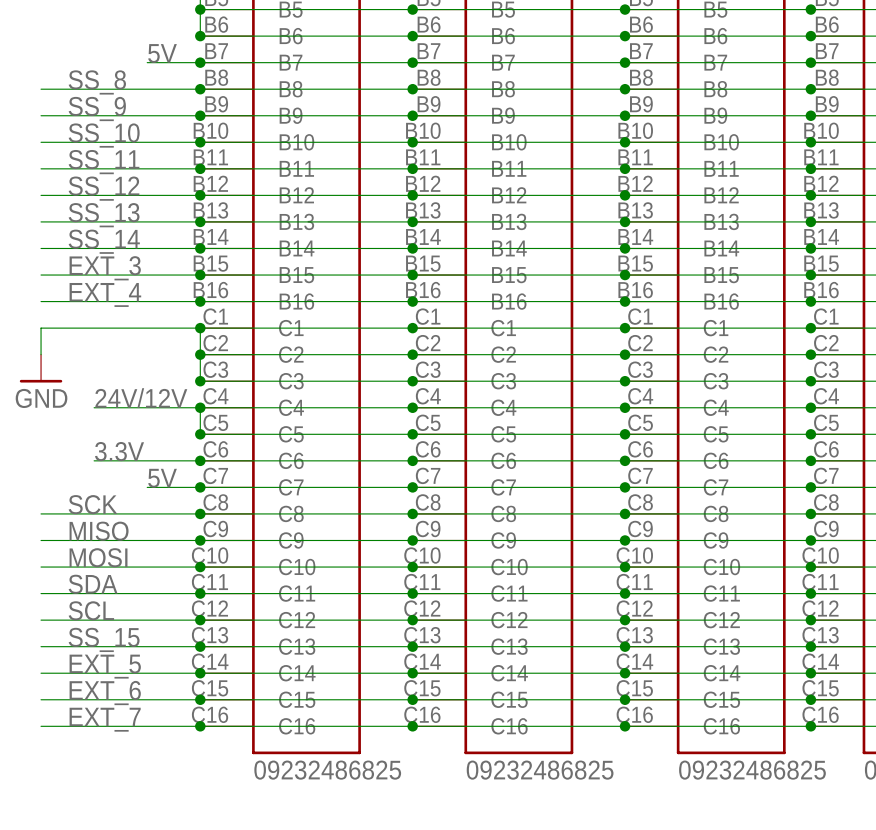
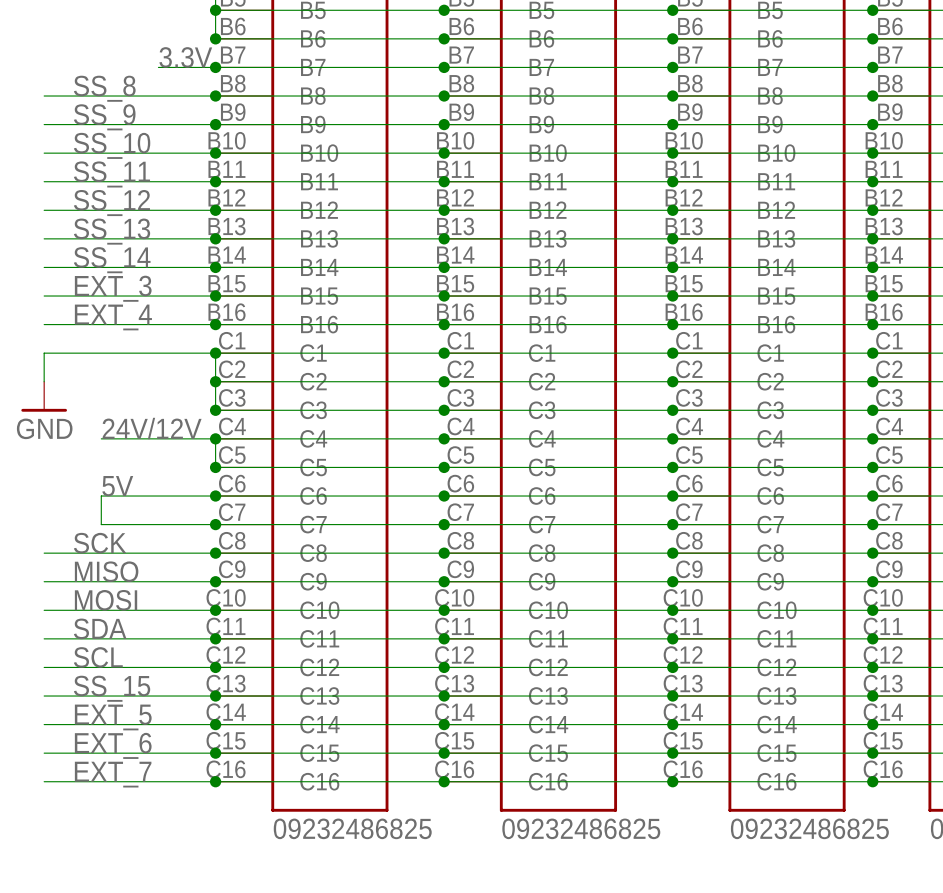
label: 5V (162, 53) -> 3.3V (185, 57)
label: 3.3V (119, 451) -> 5V (117, 486)
wire: none -> (101, 496) (101, 524) (158, 524)
label: 5V (162, 478) -> none

